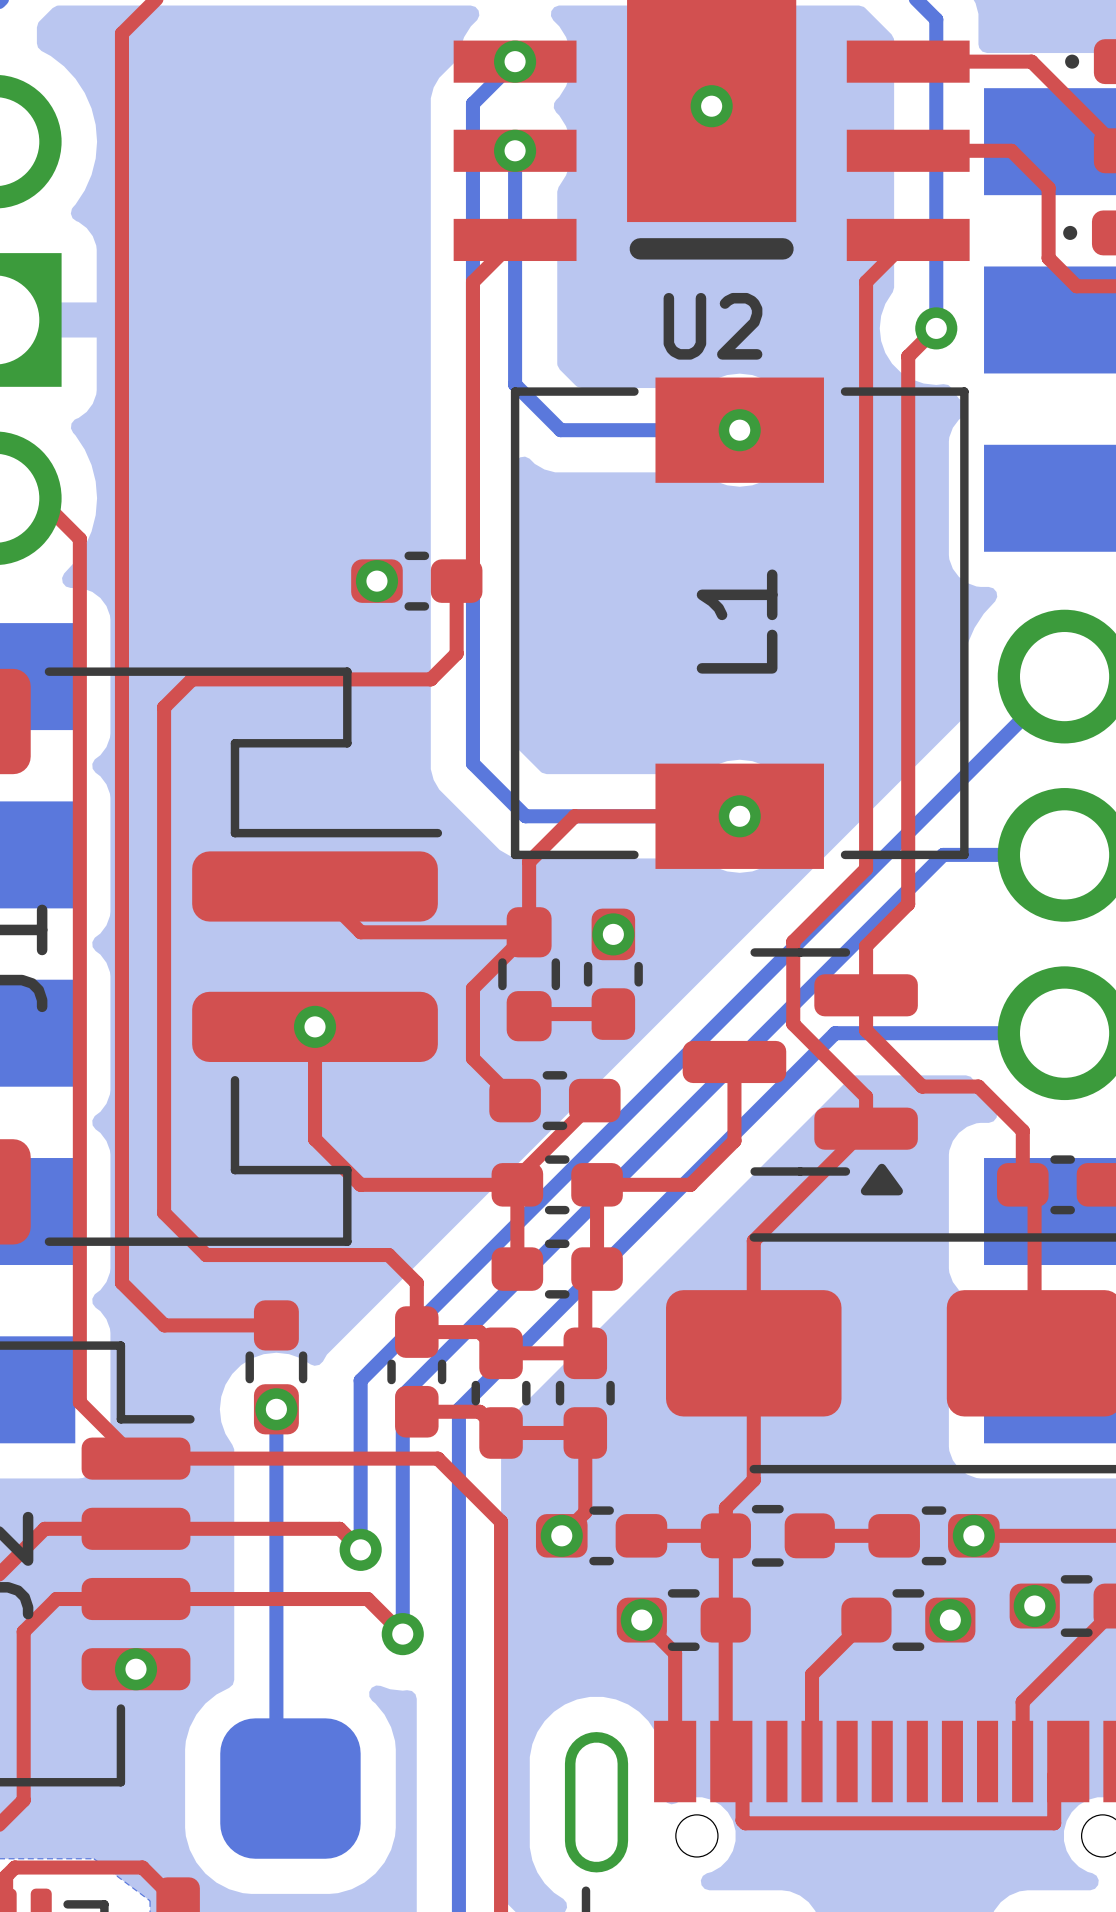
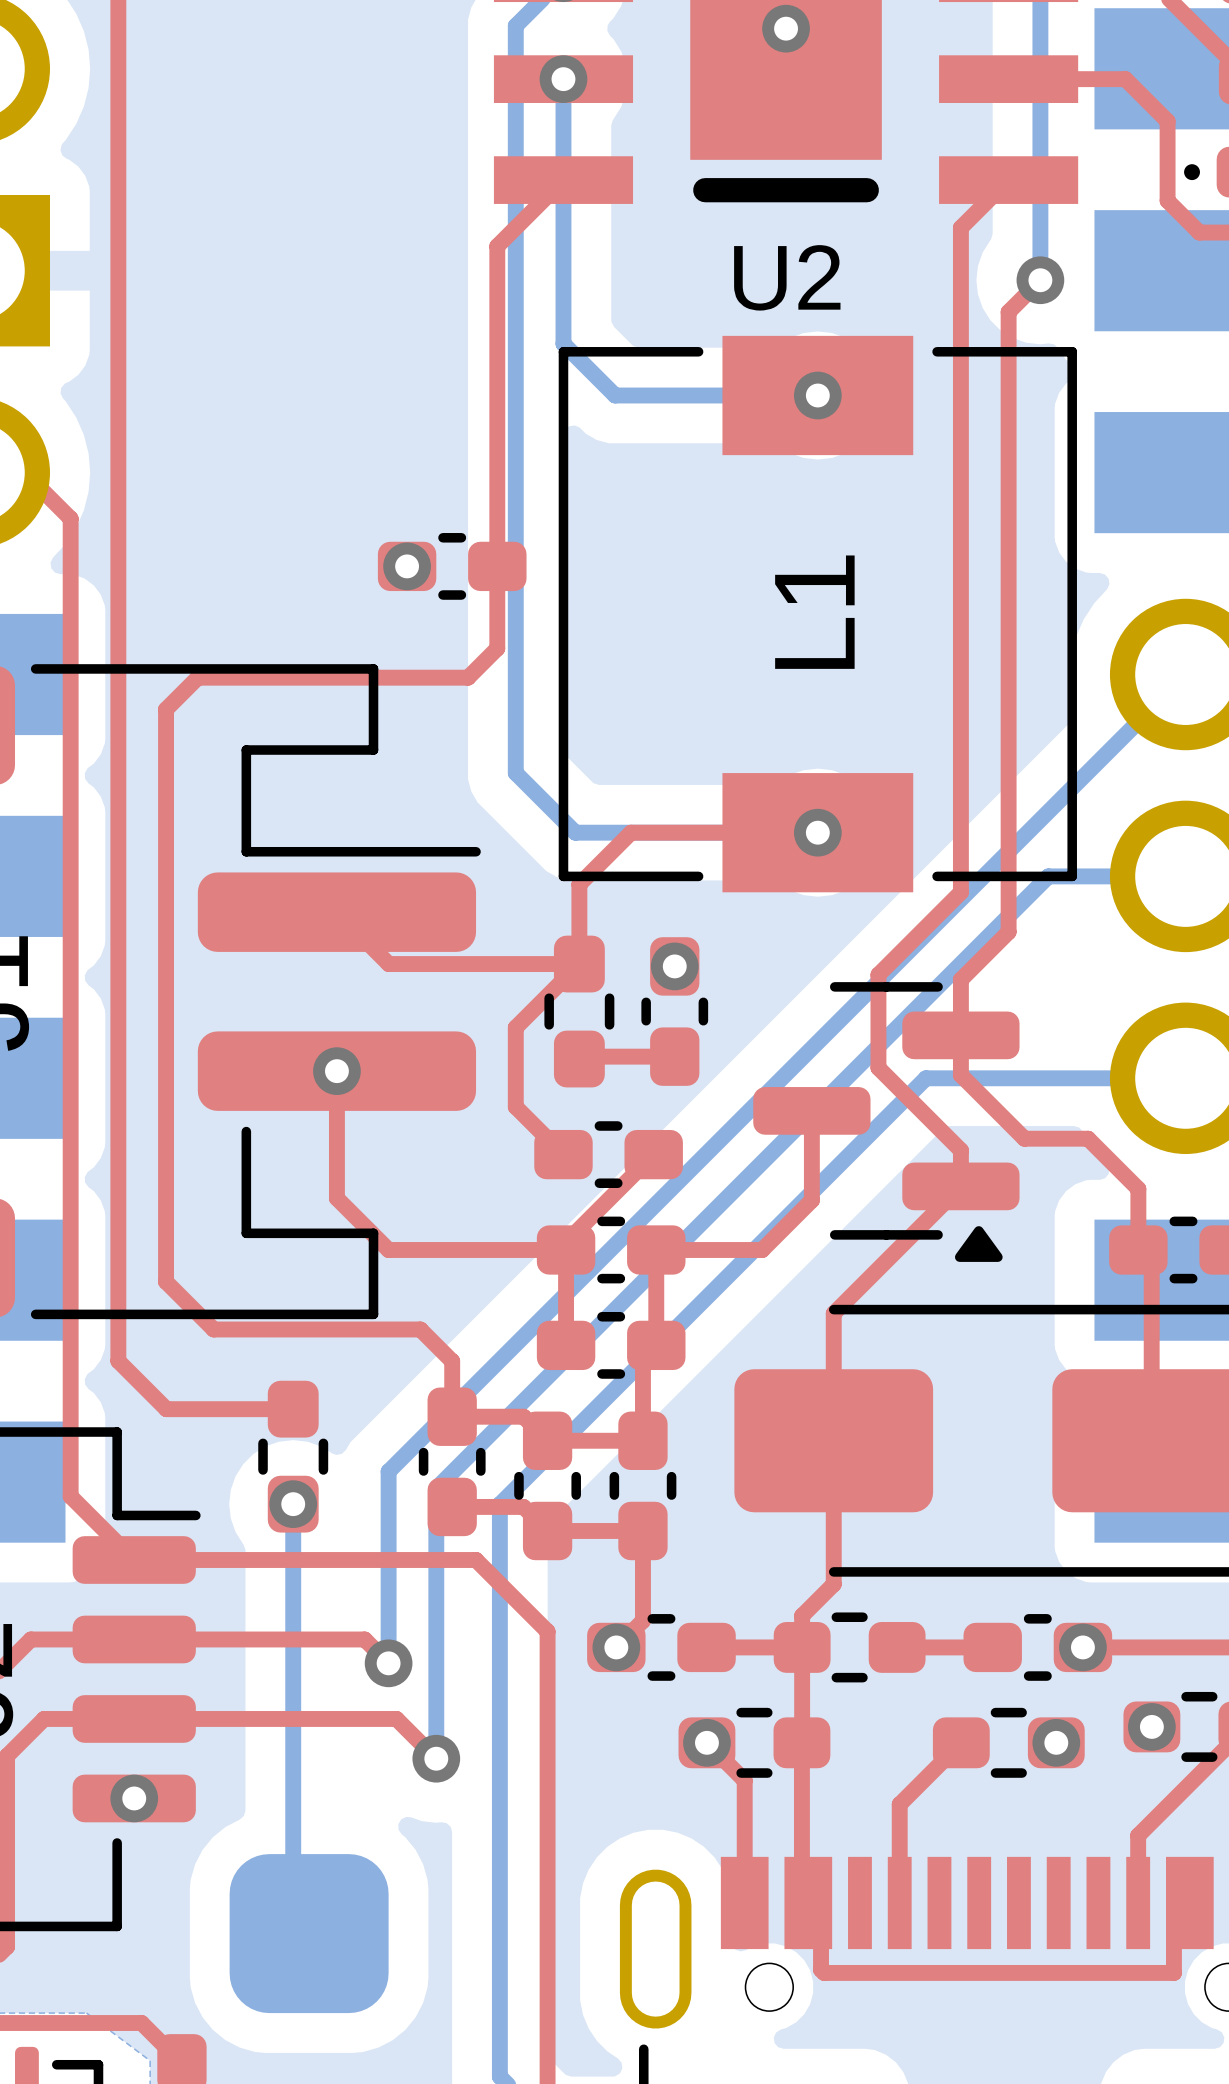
top track: (472, 282) (472, 564) (456, 581) -> (515, 227) (497, 246) (497, 566)

